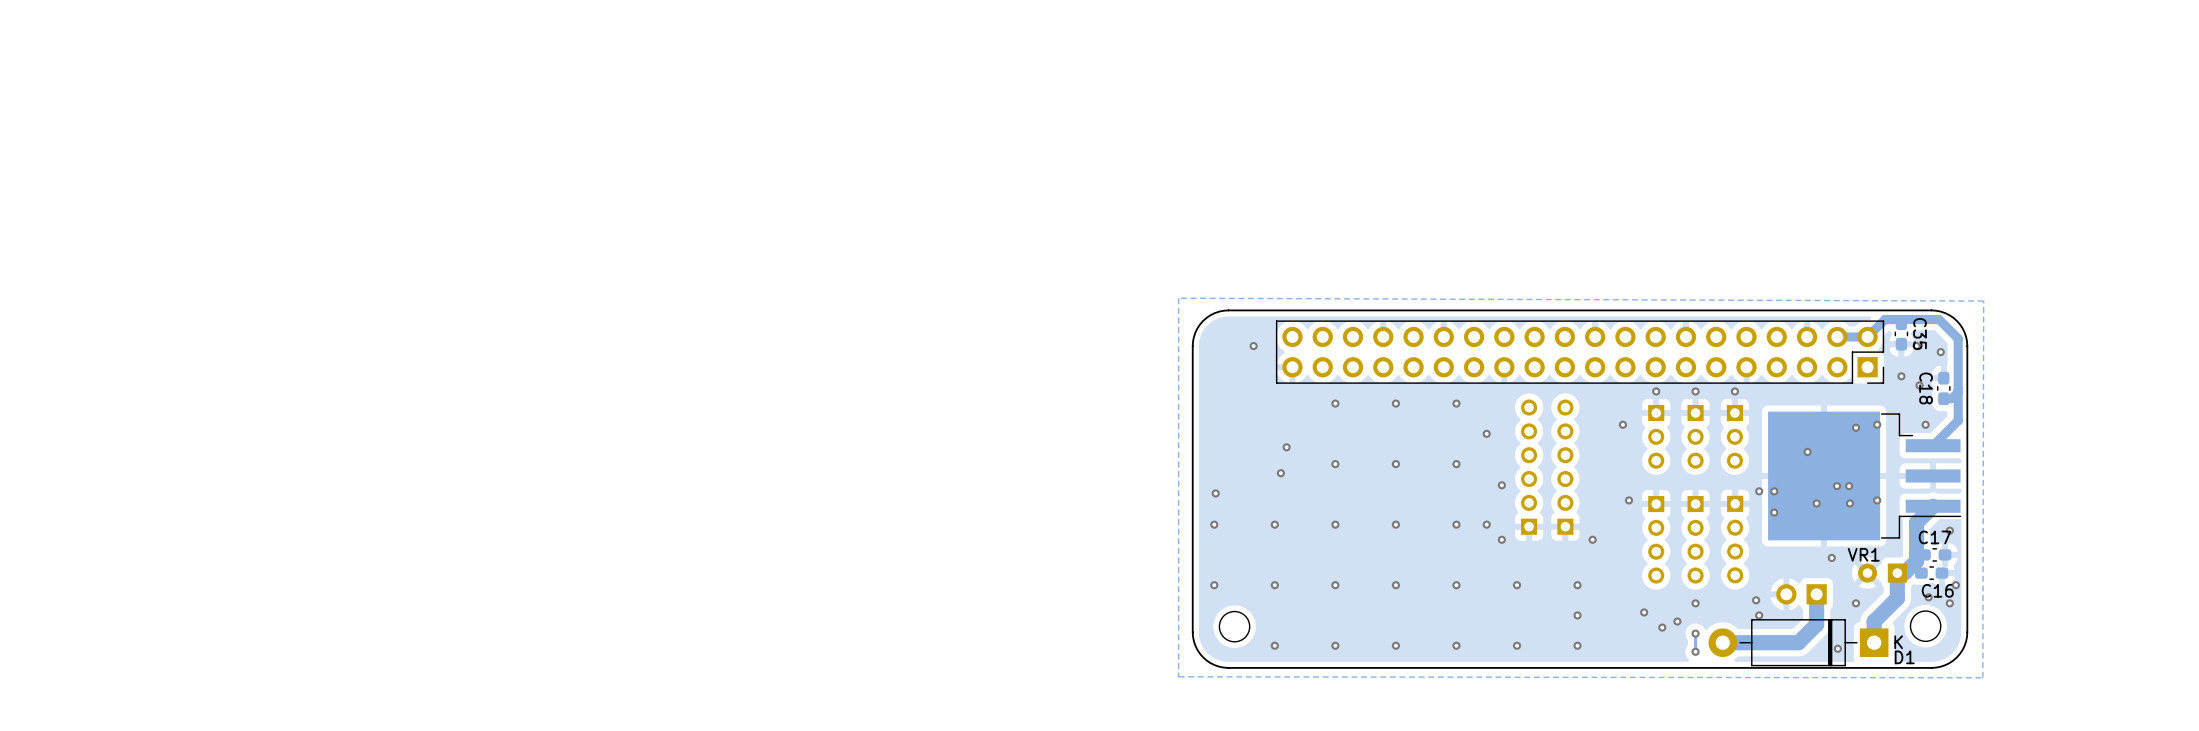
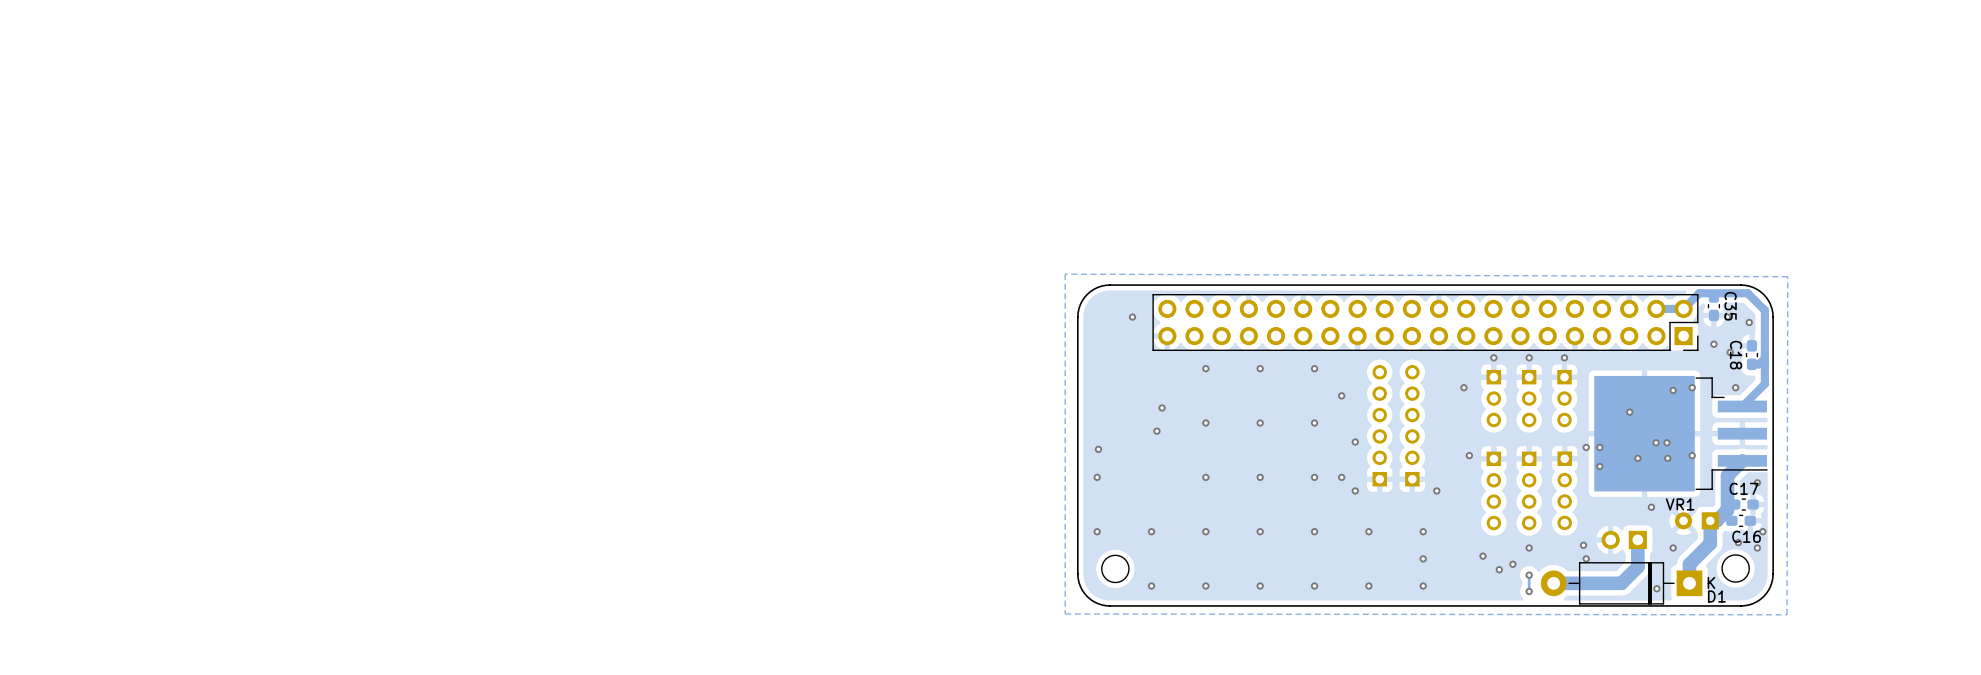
via: (1274, 524) -> none

